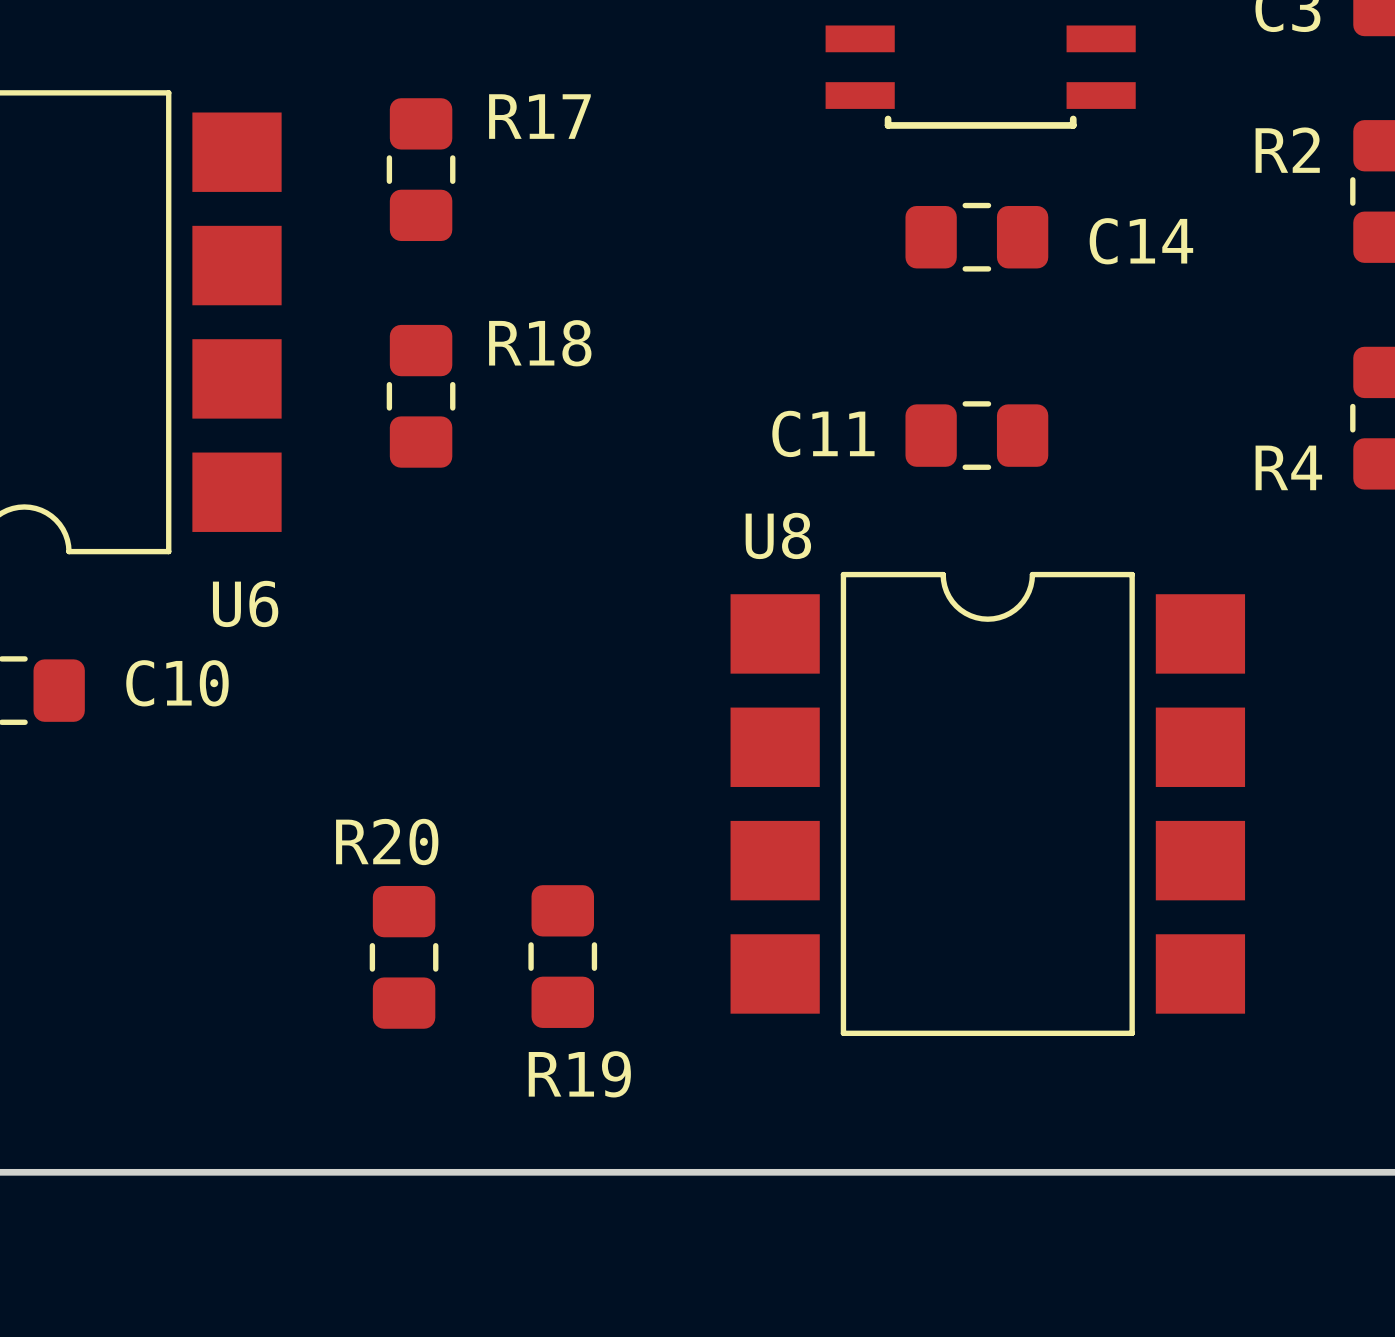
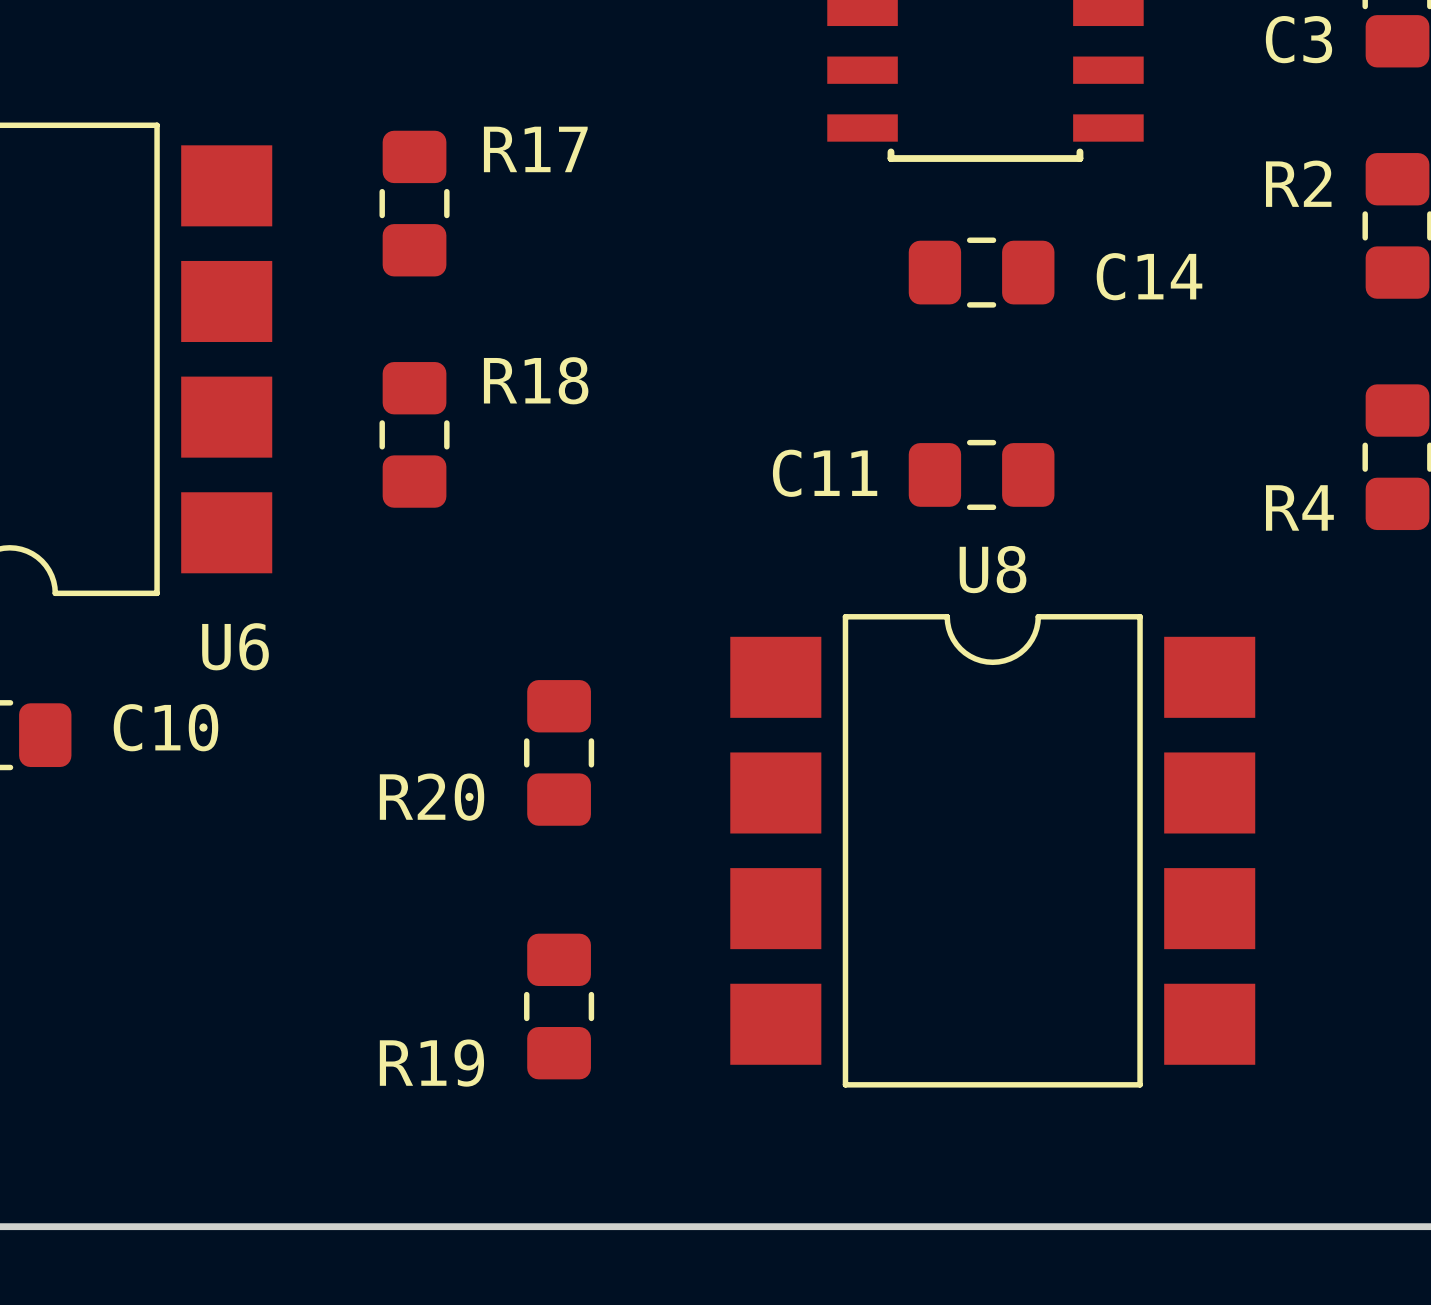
U8 name position: U8 (778, 535) -> U8 (993, 569)
R20 name position: R20 (387, 841) -> R20 (432, 797)
R20 position: (404, 957) -> (559, 752)
R19 name position: R19 (579, 1074) -> R19 (431, 1063)

